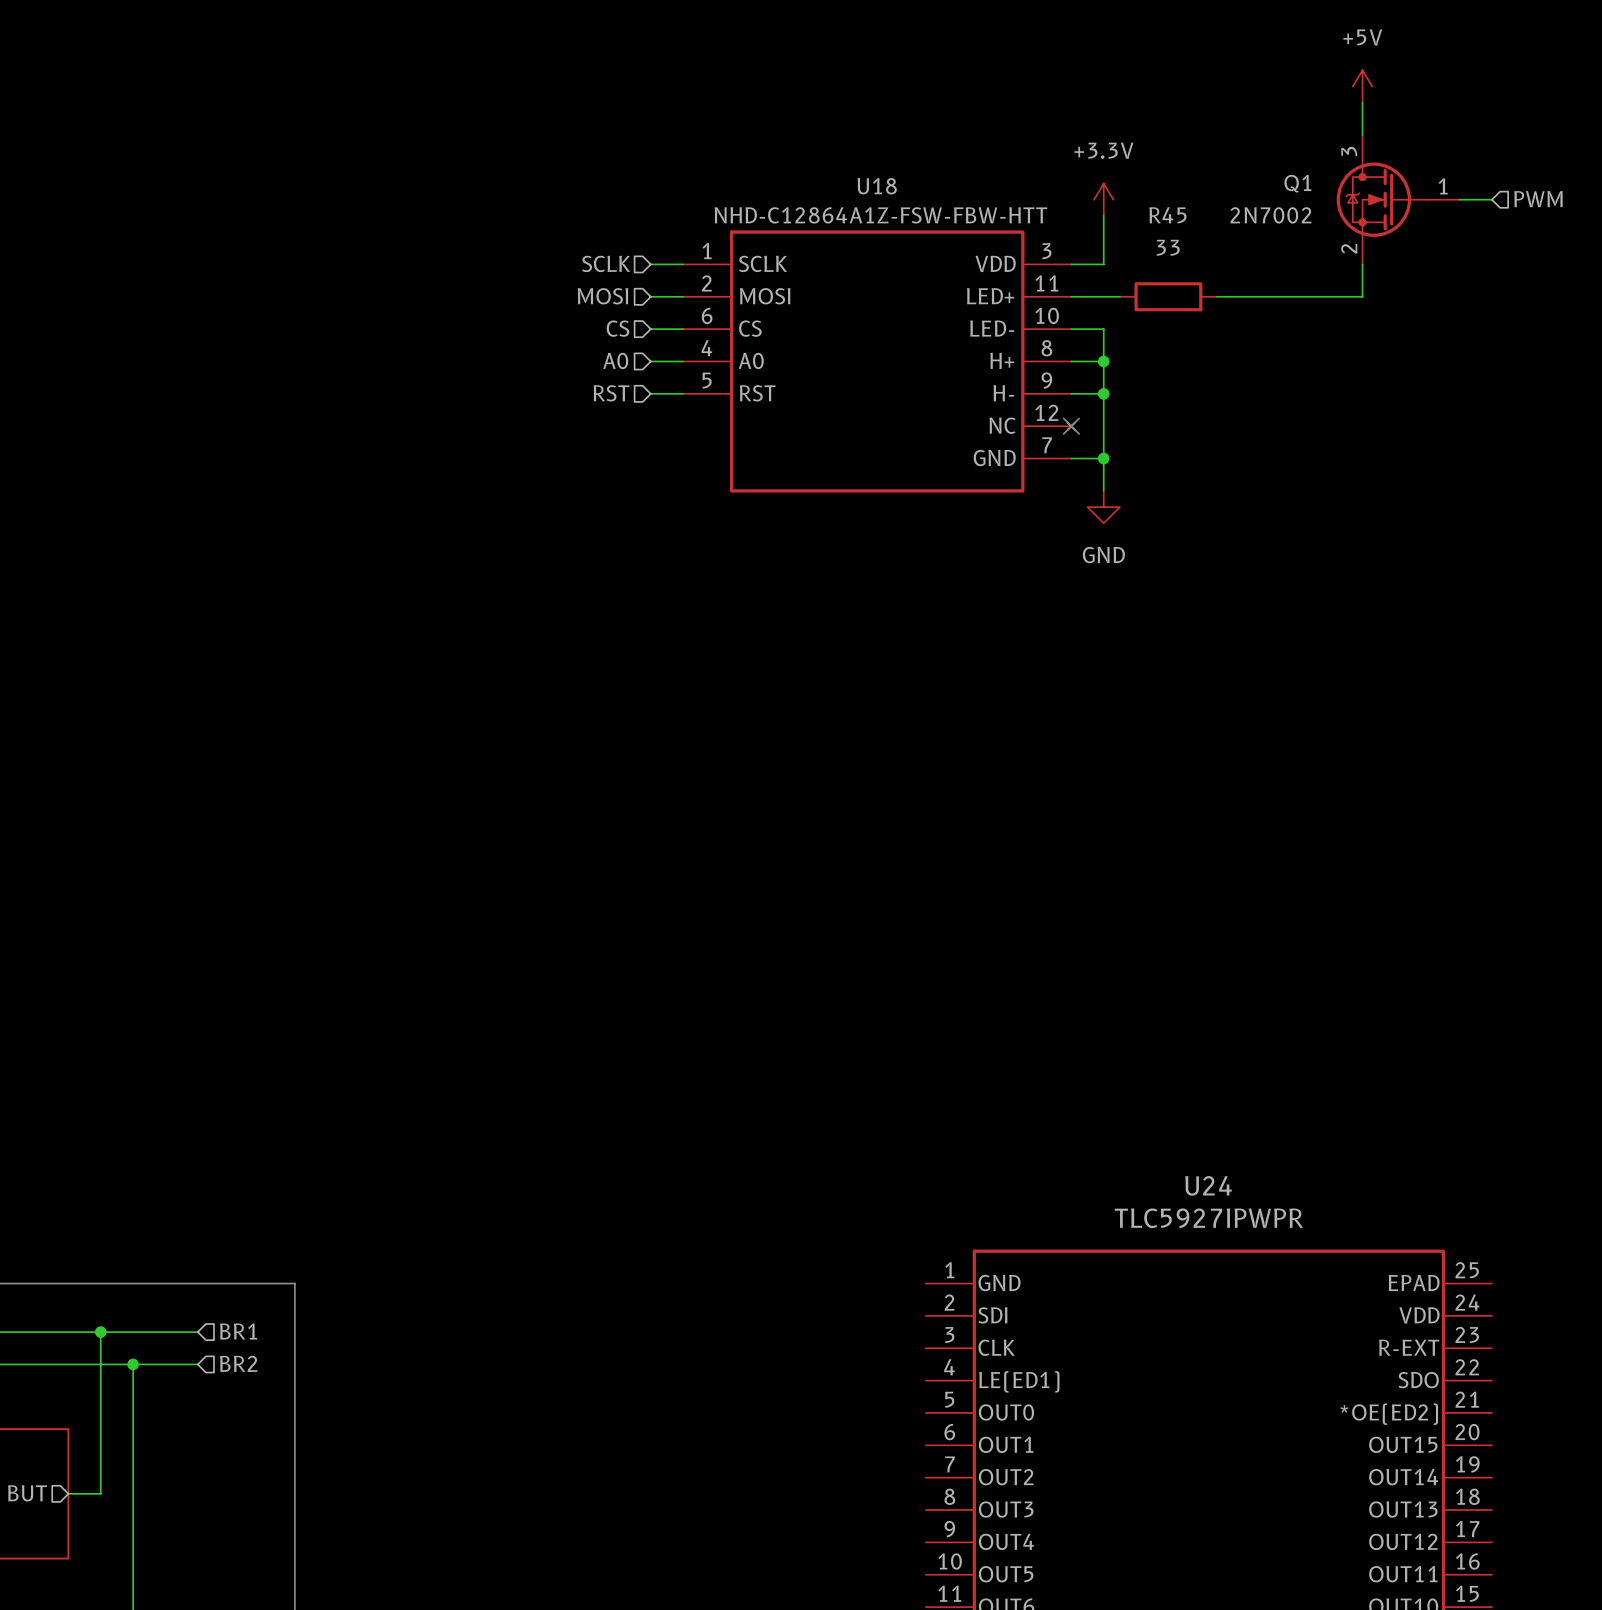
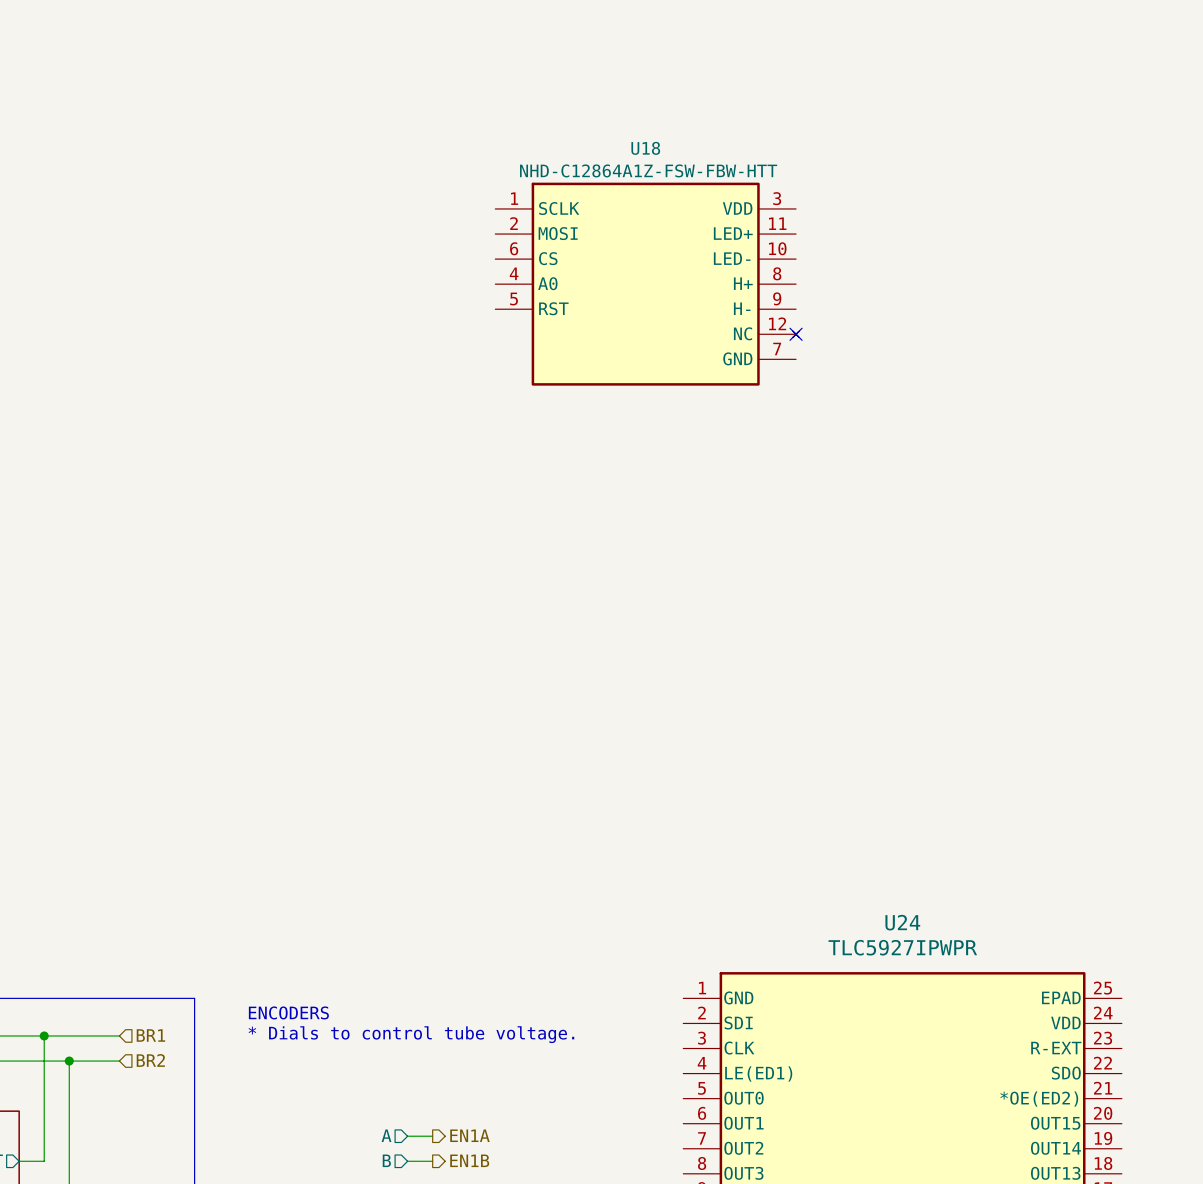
power symbol: +5V (1362, 86) -> none
wire: (1362, 102) (1362, 135) -> none
power symbol: +3.3V (1103, 199) -> none
Q1: 2N7002 (1398, 199) -> none
wire: (1459, 199) (1491, 199) -> none
hierarchical label: PWM (1538, 199) -> none
wire: (1103, 215) (1103, 264) (1071, 264) -> none
hierarchical label: SCLK (606, 263) -> none
wire: (650, 264) (683, 264) -> none
wire: (1362, 264) (1362, 296) (1216, 296) -> none
hierarchical label: MOSI (602, 296) -> none
wire: (650, 296) (683, 296) -> none
wire: (1071, 296) (1119, 296) -> none
R45: 33 (1168, 296) -> none
hierarchical label: CS (617, 328) -> none
wire: (650, 329) (683, 329) -> none
wire: (1071, 329) (1103, 329) (1103, 490) -> none
hierarchical label: A0 (615, 360) -> none
wire: (650, 361) (683, 361) -> none
wire: (1071, 361) (1103, 361) -> none
junction: (1103, 361) -> none
hierarchical label: RST (611, 393) -> none
wire: (650, 393) (683, 393) -> none
wire: (1071, 393) (1103, 393) -> none
junction: (1103, 393) -> none
wire: (1071, 458) (1103, 458) -> none
junction: (1103, 458) -> none
power symbol: GND (1103, 507) -> none
text: none -> ENCODERS (288, 1012)
text: none -> * Dials to control tube voltage. (411, 1034)
sheet pin: none -> A (386, 1135)
hierarchical label: none -> EN1A (469, 1135)
wire: none -> (407, 1136) (432, 1136)
sheet pin: none -> B (386, 1160)
wire: none -> (407, 1161) (432, 1161)
hierarchical label: none -> EN1B (469, 1160)

